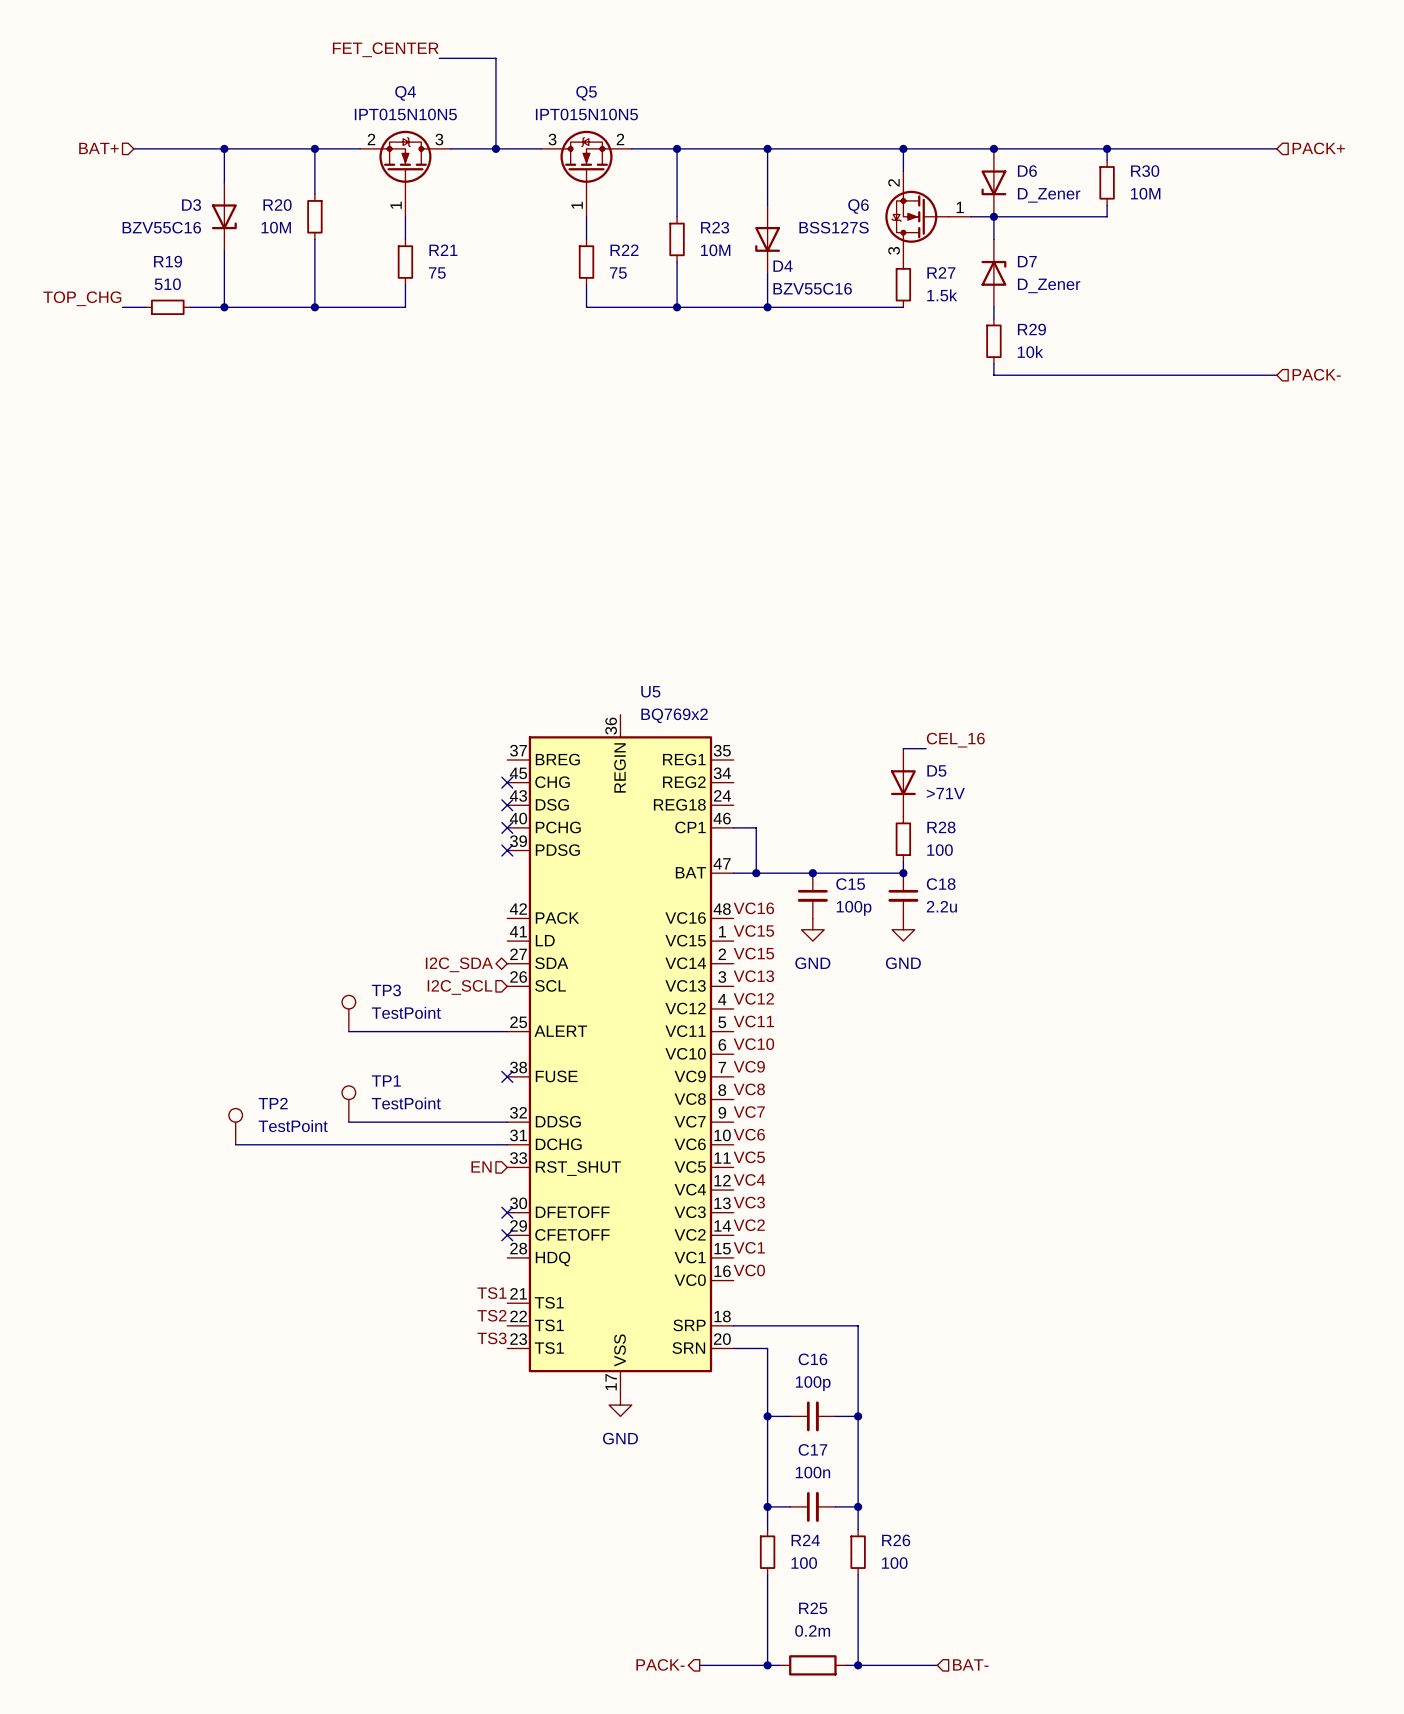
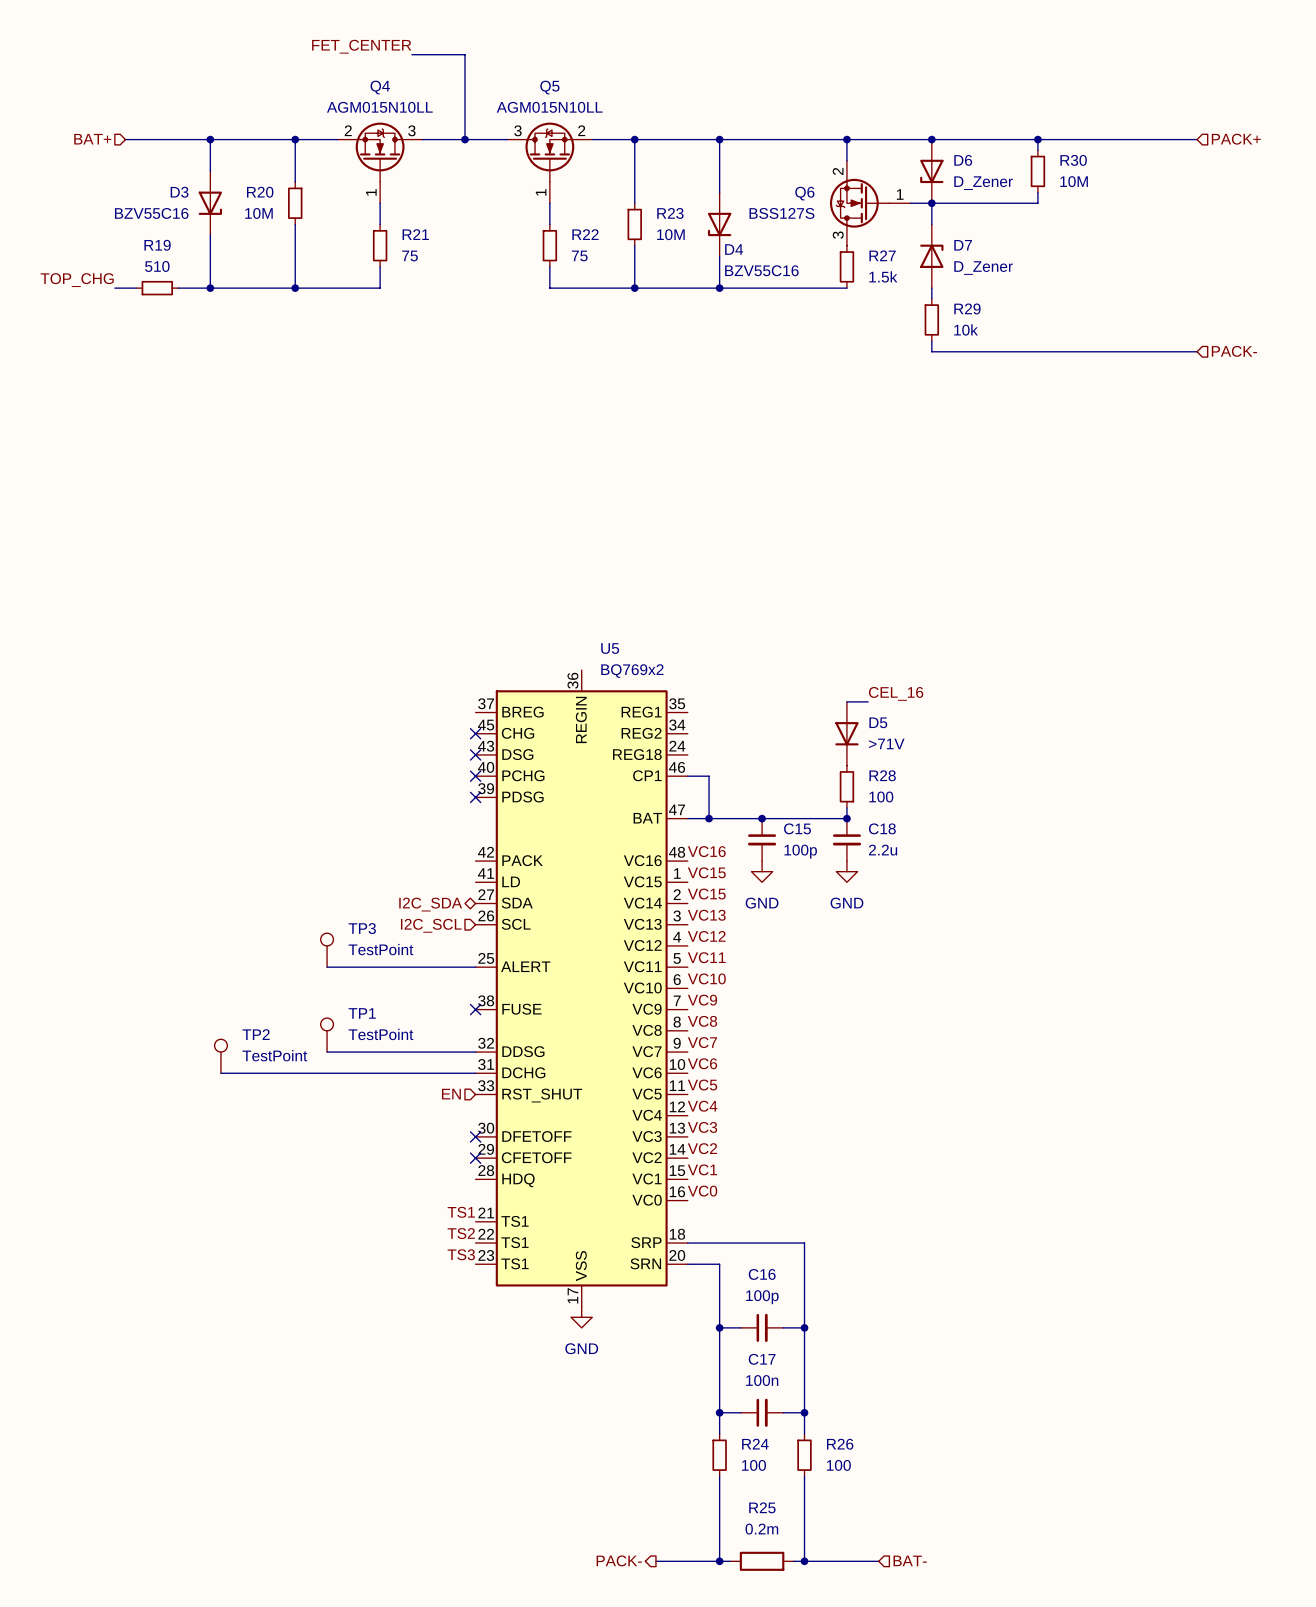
Q4 value: IPT015N10N5 (405, 114) -> AGM015N10LL (379, 107)
Q5 value: IPT015N10N5 (586, 114) -> AGM015N10LL (549, 107)

